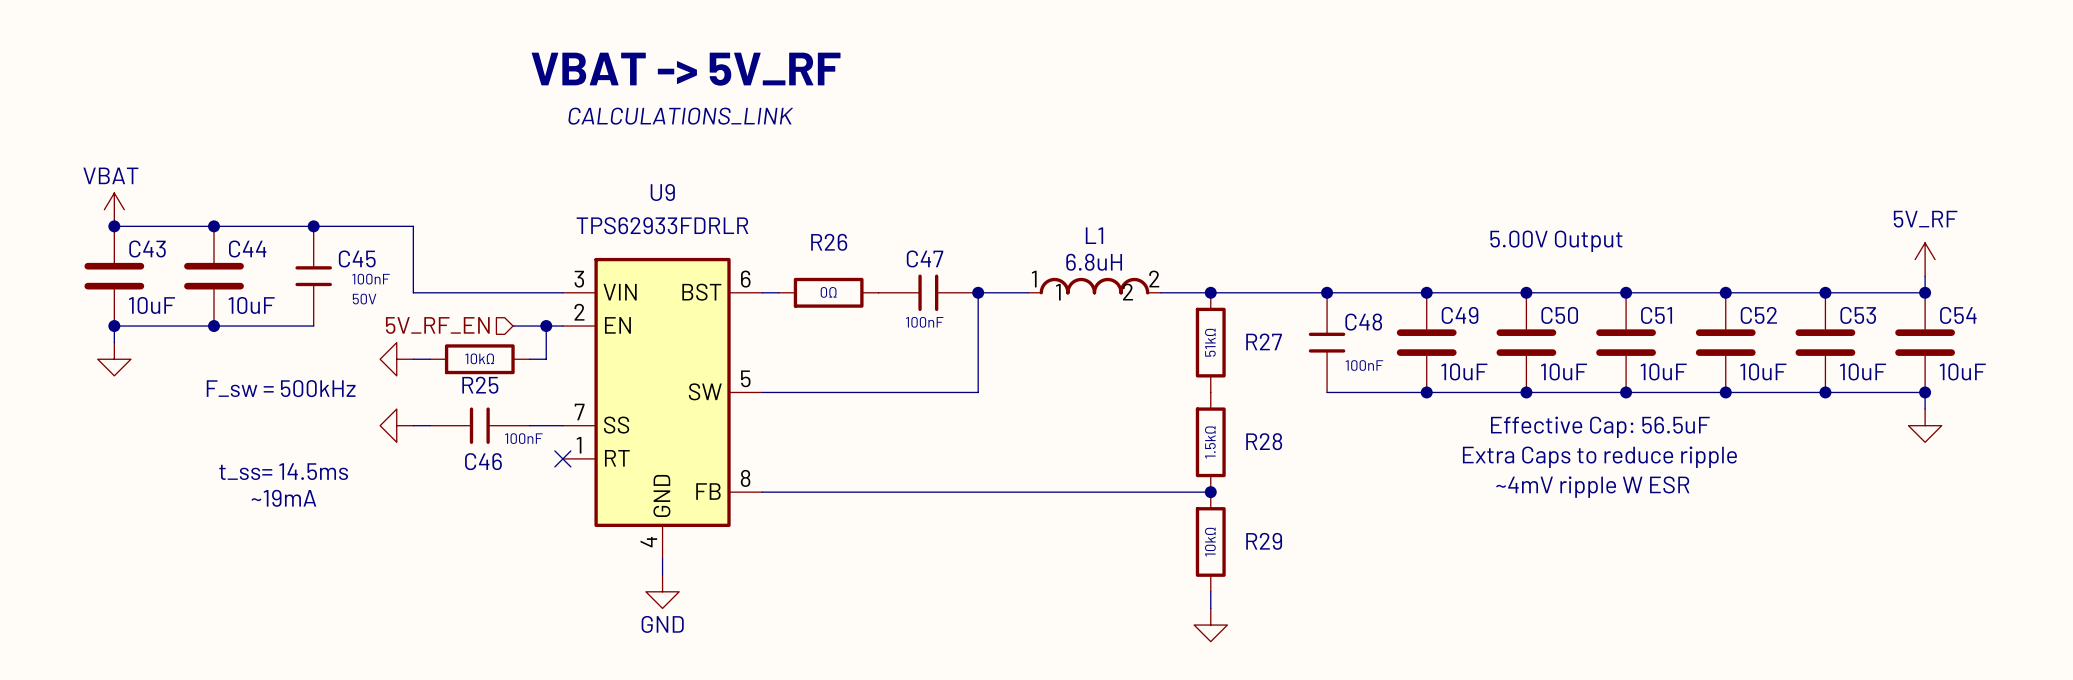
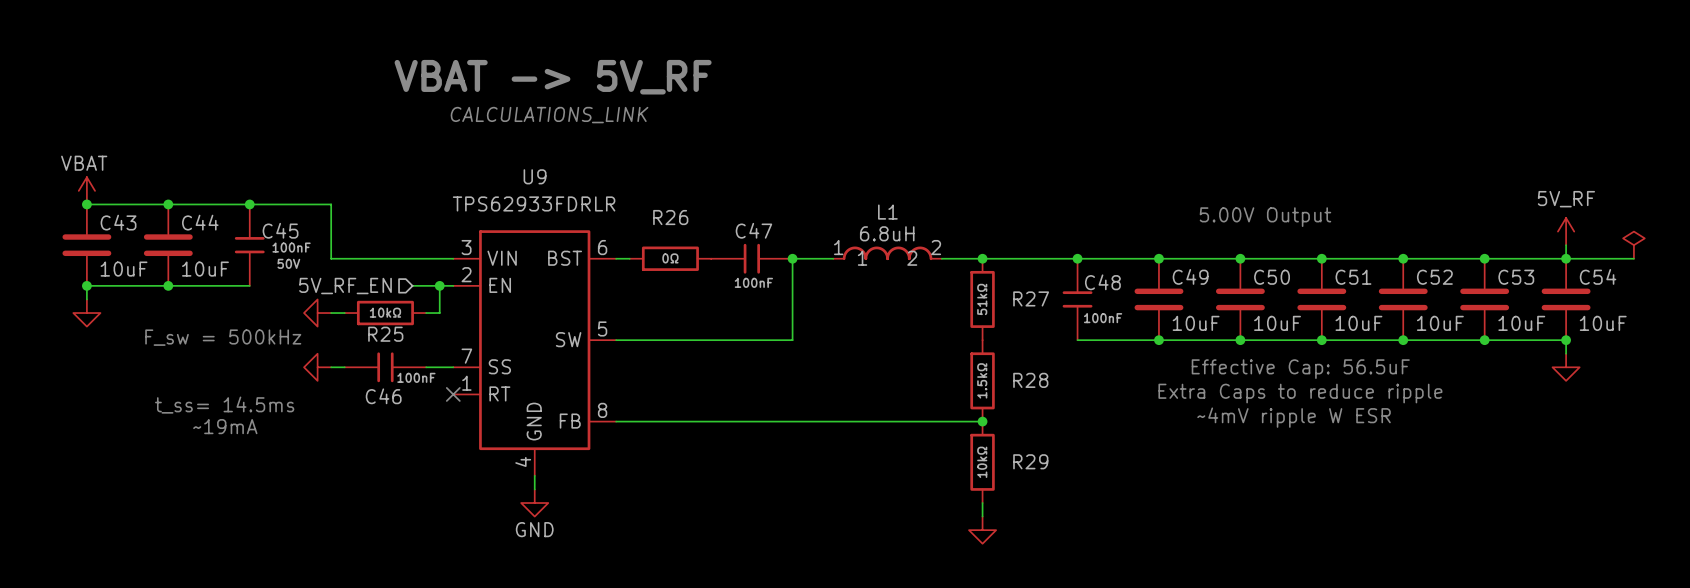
power symbol: none -> (1633, 245)
wire: none -> (1566, 258) (1633, 258)

